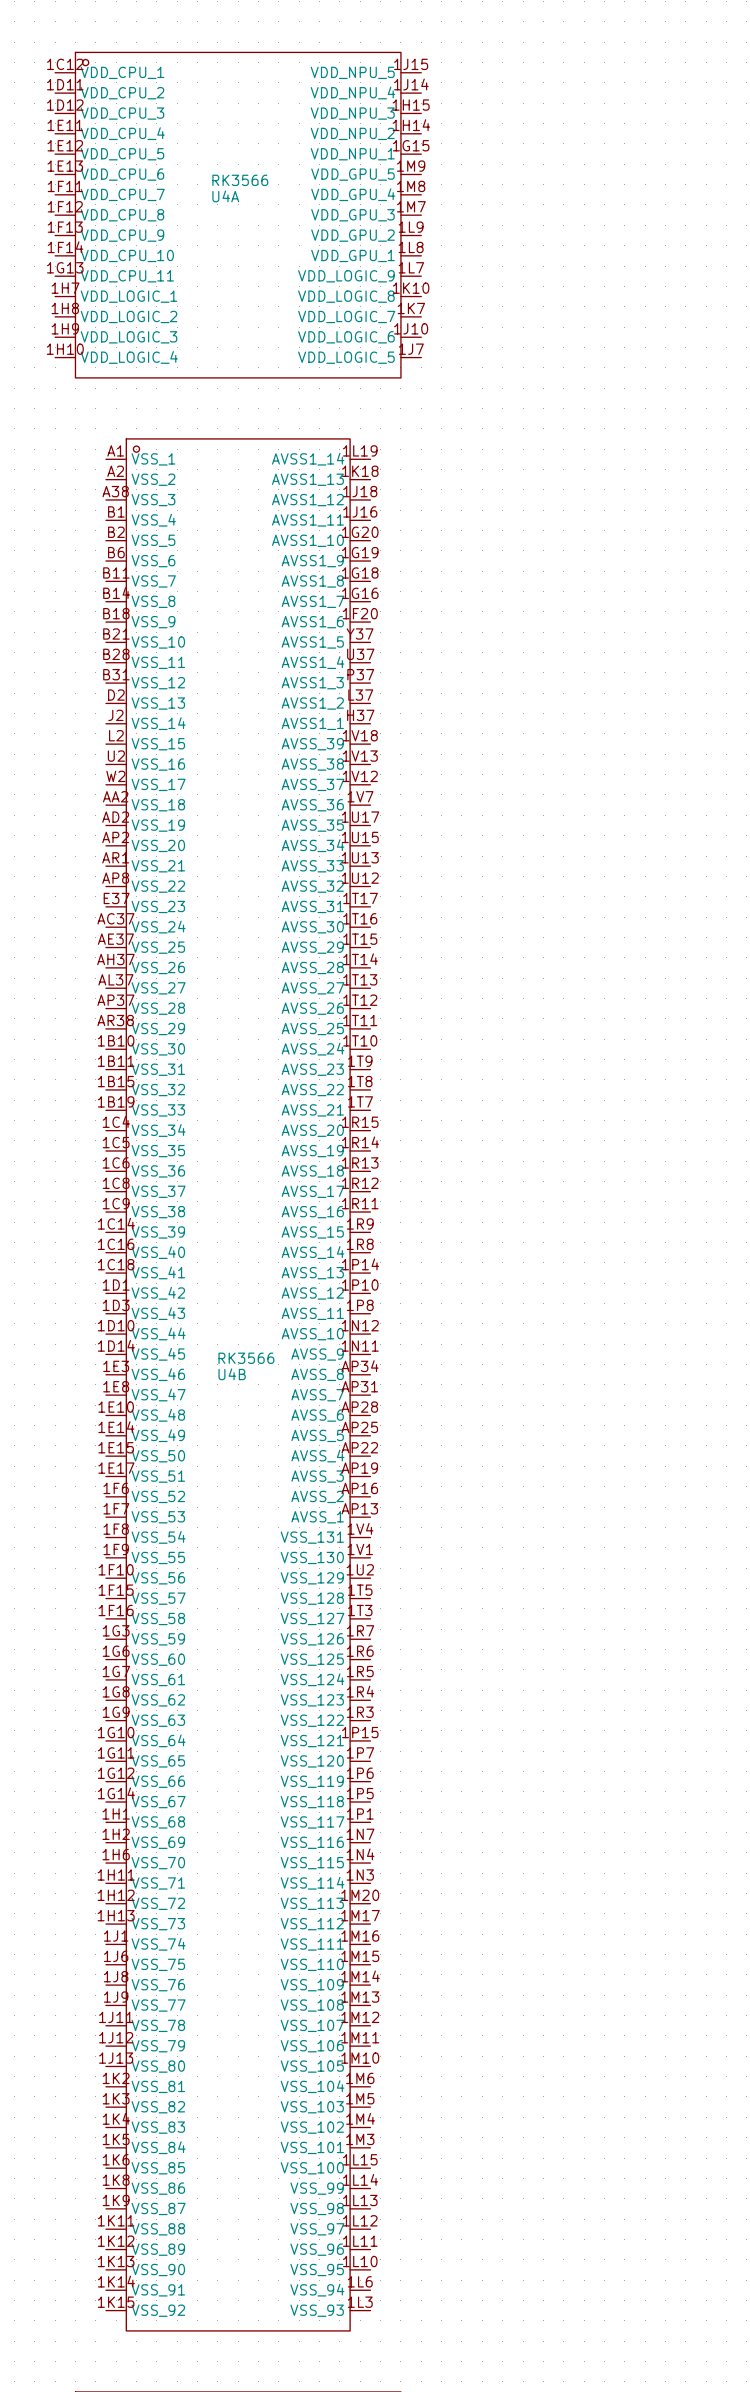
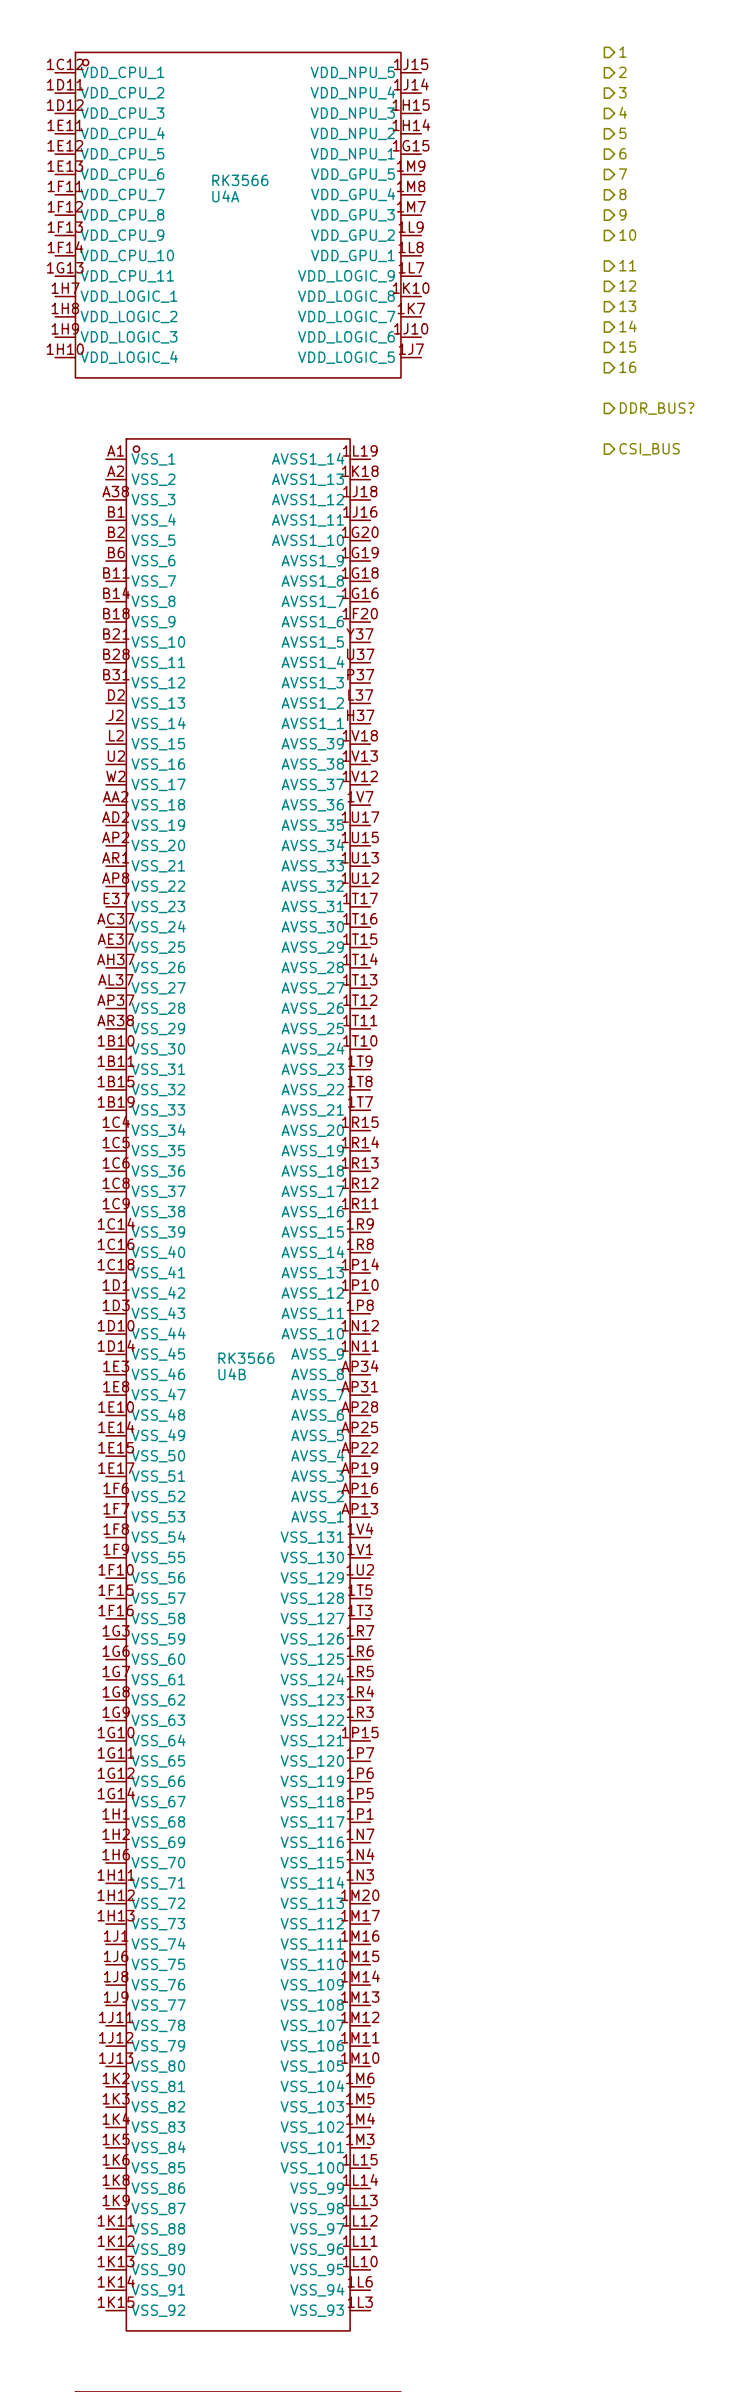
hierarchical label: none -> 1 (622, 52)
hierarchical label: none -> 2 (622, 72)
hierarchical label: none -> 3 (622, 92)
hierarchical label: none -> 4 (623, 112)
hierarchical label: none -> 5 (622, 133)
hierarchical label: none -> 6 (622, 153)
hierarchical label: none -> 7 (622, 174)
hierarchical label: none -> 8 (622, 194)
hierarchical label: none -> 9 (622, 214)
hierarchical label: none -> 10 (627, 235)
hierarchical label: none -> 11 (627, 265)
hierarchical label: none -> 12 (627, 285)
hierarchical label: none -> 13 (627, 306)
hierarchical label: none -> 14 (628, 326)
hierarchical label: none -> 15 (627, 347)
hierarchical label: none -> 16 (627, 367)
hierarchical label: none -> DDR_BUS? (657, 408)
hierarchical label: none -> CSI_BUS (649, 449)

